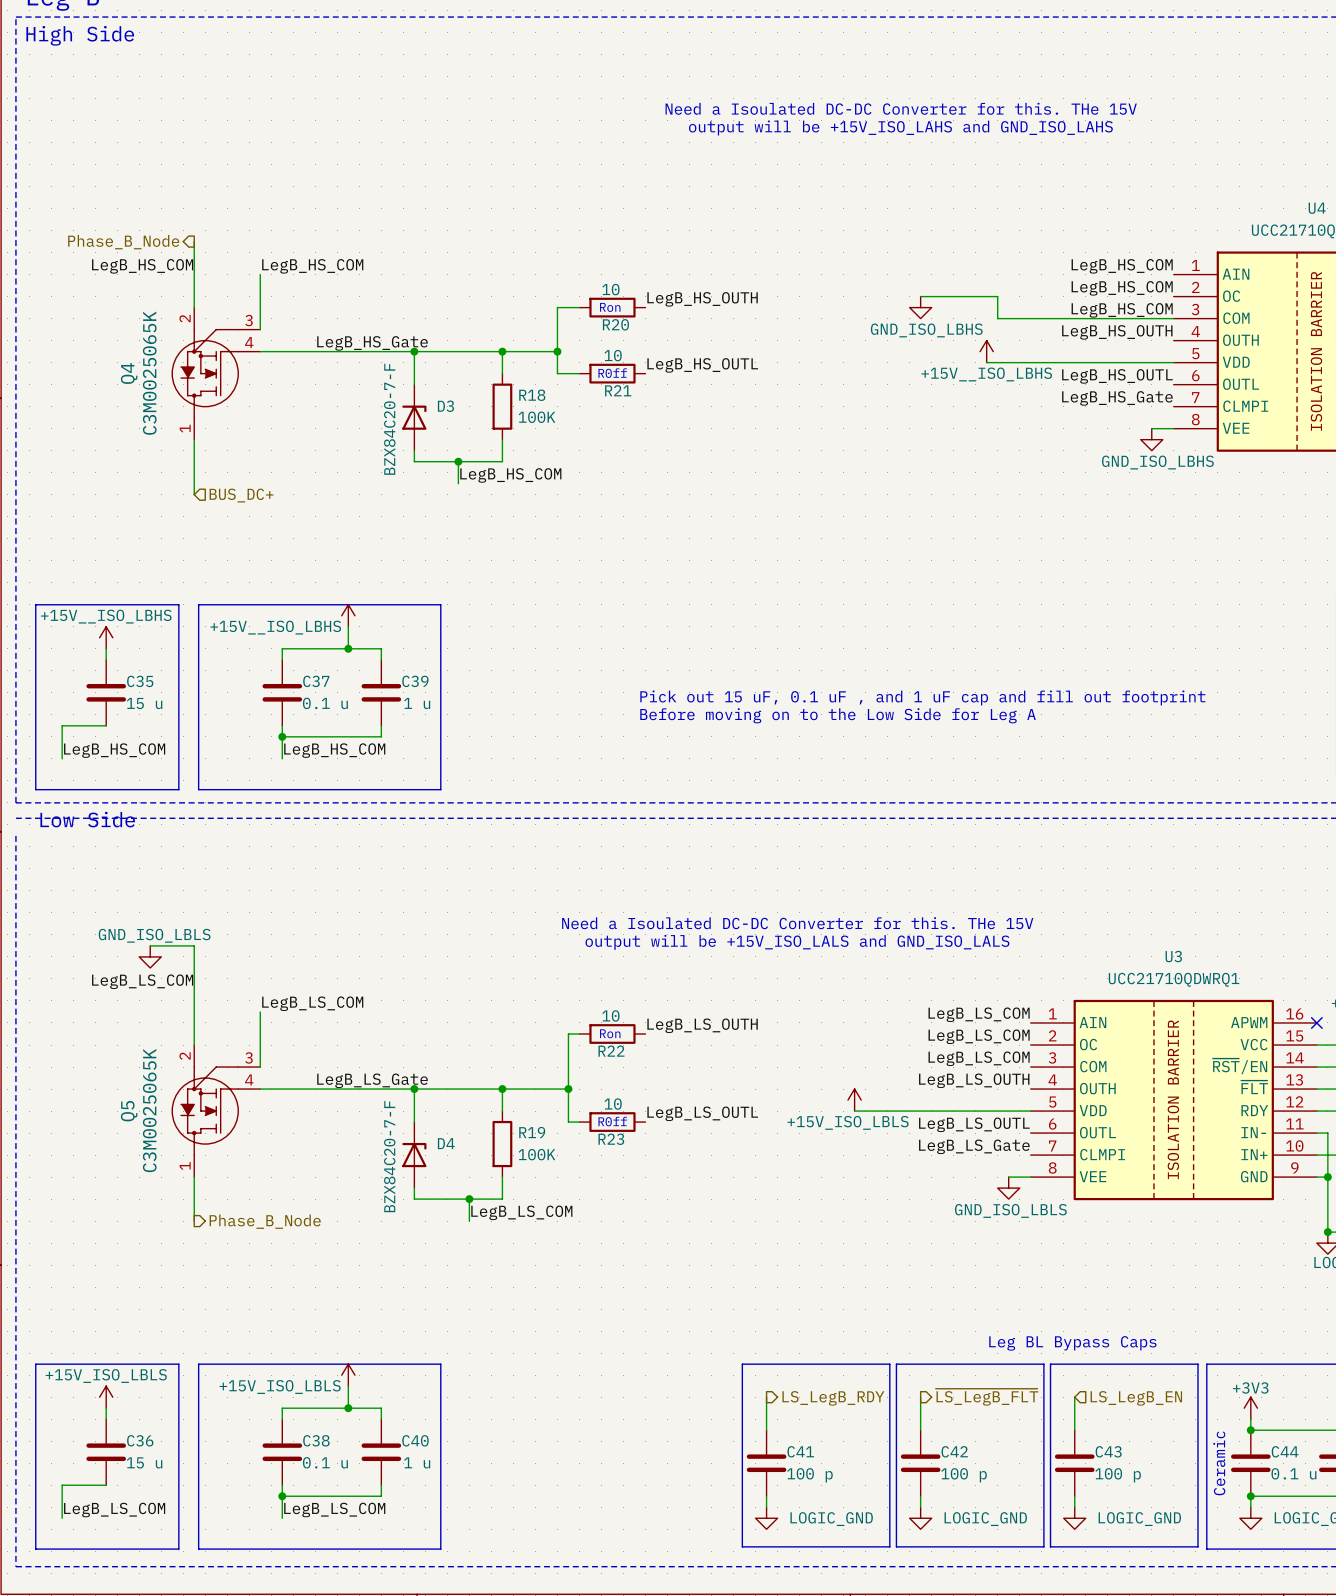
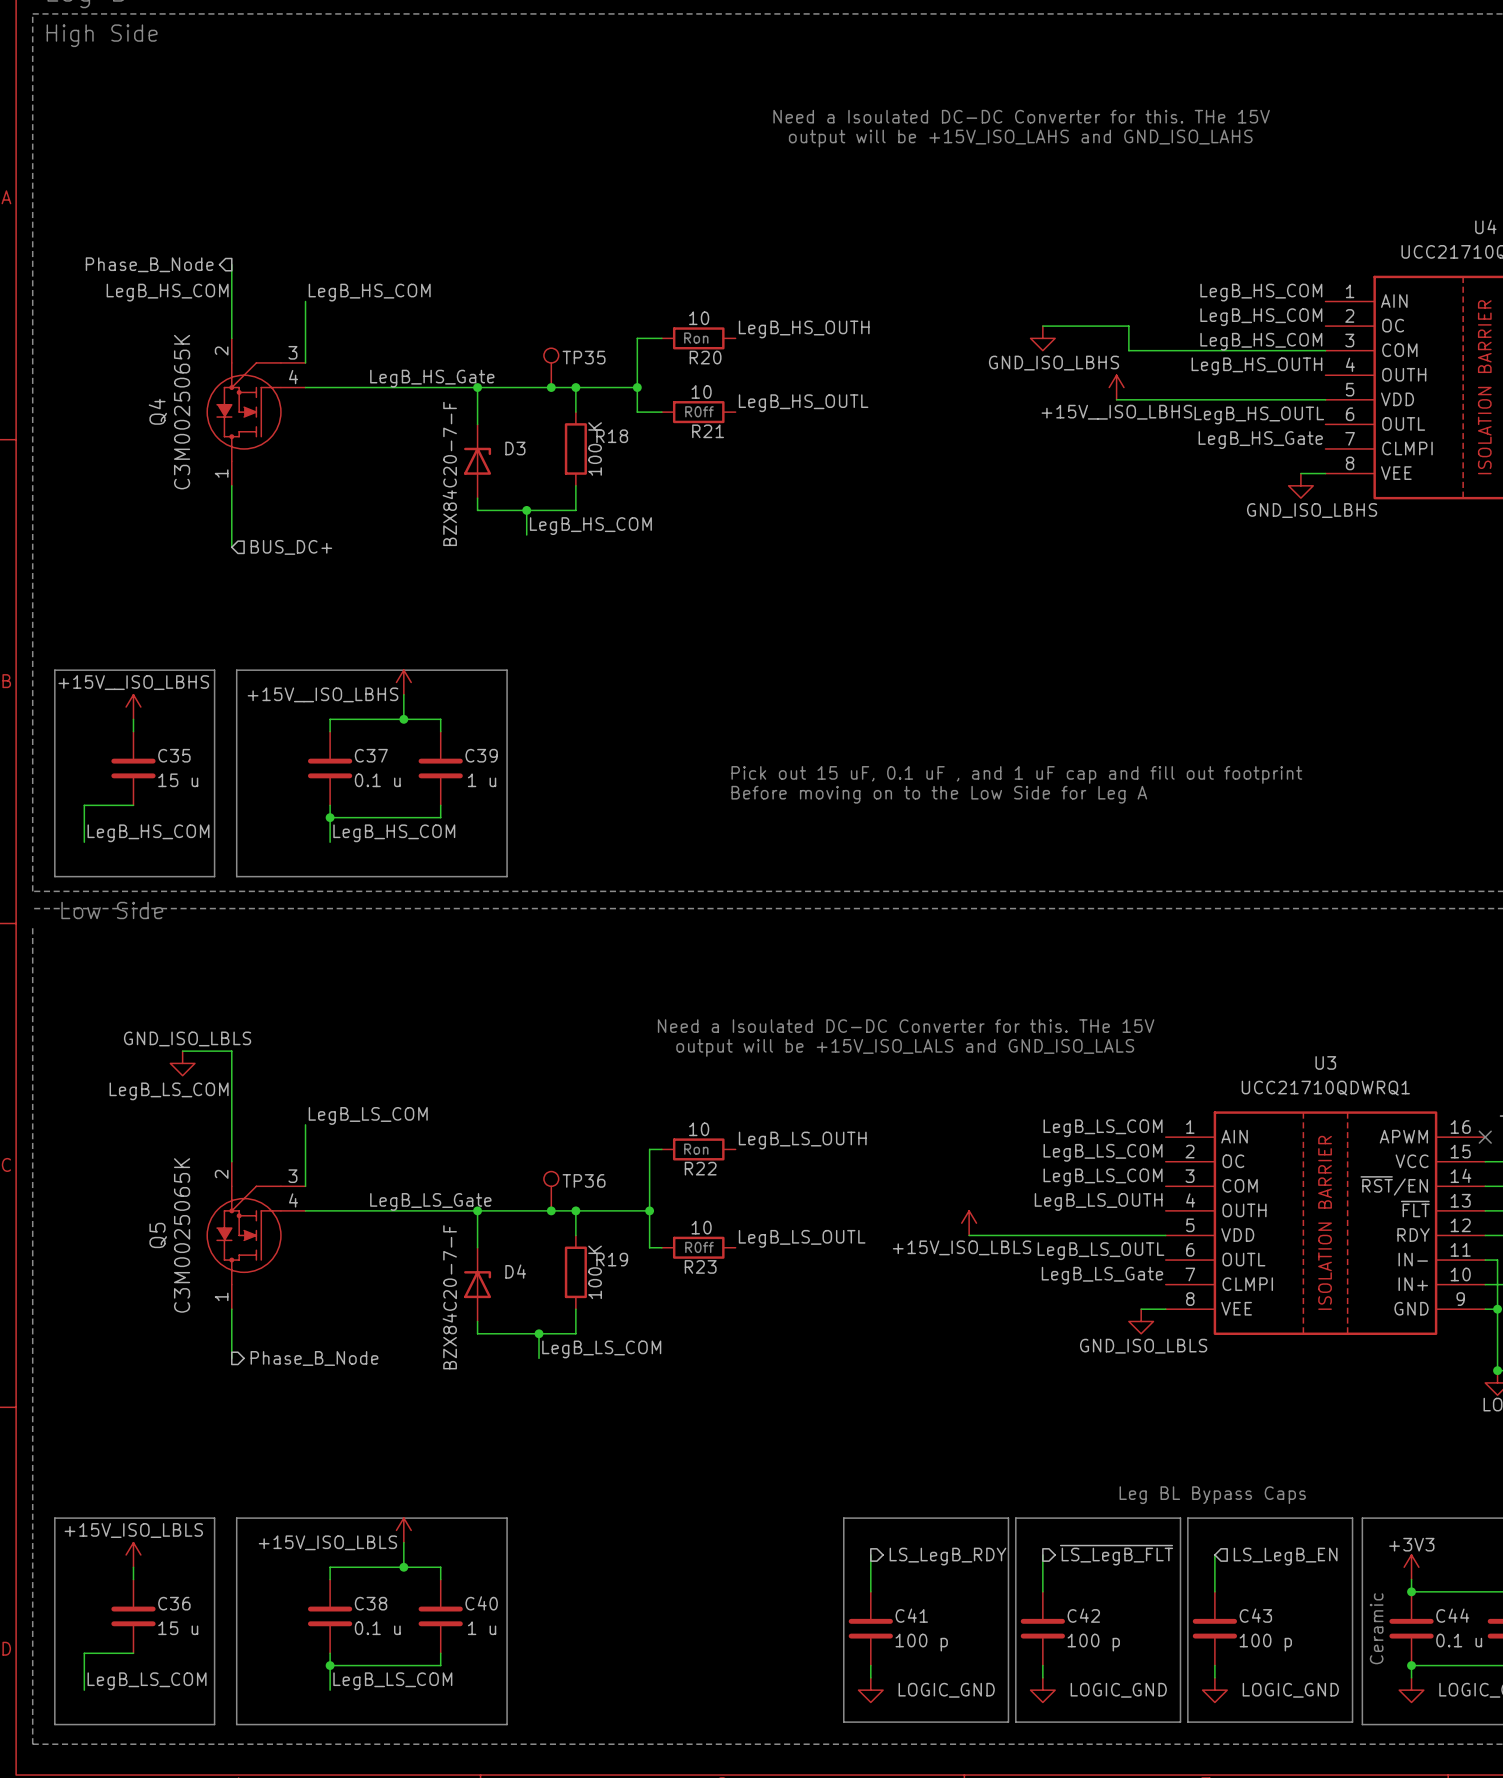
TP35: none -> (551, 367)
junction: none -> (551, 387)
R18 value: 100K (536, 417) -> 100 K (595, 448)
TP36: none -> (551, 1191)
junction: none -> (551, 1210)
R19 value: 100K (536, 1154) -> 100 K (595, 1272)

